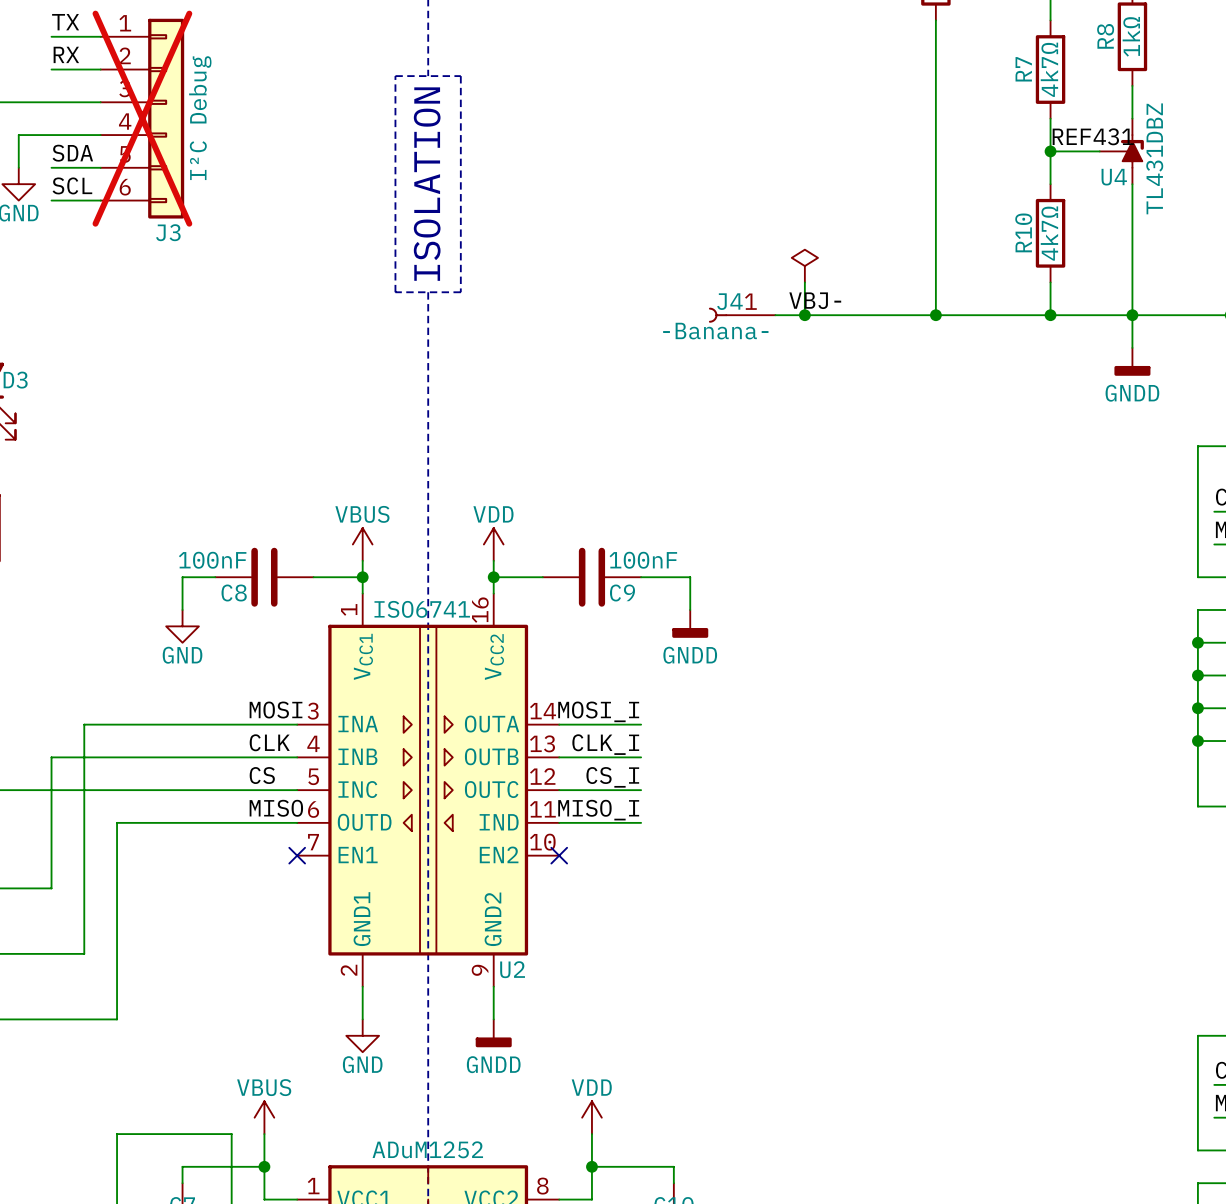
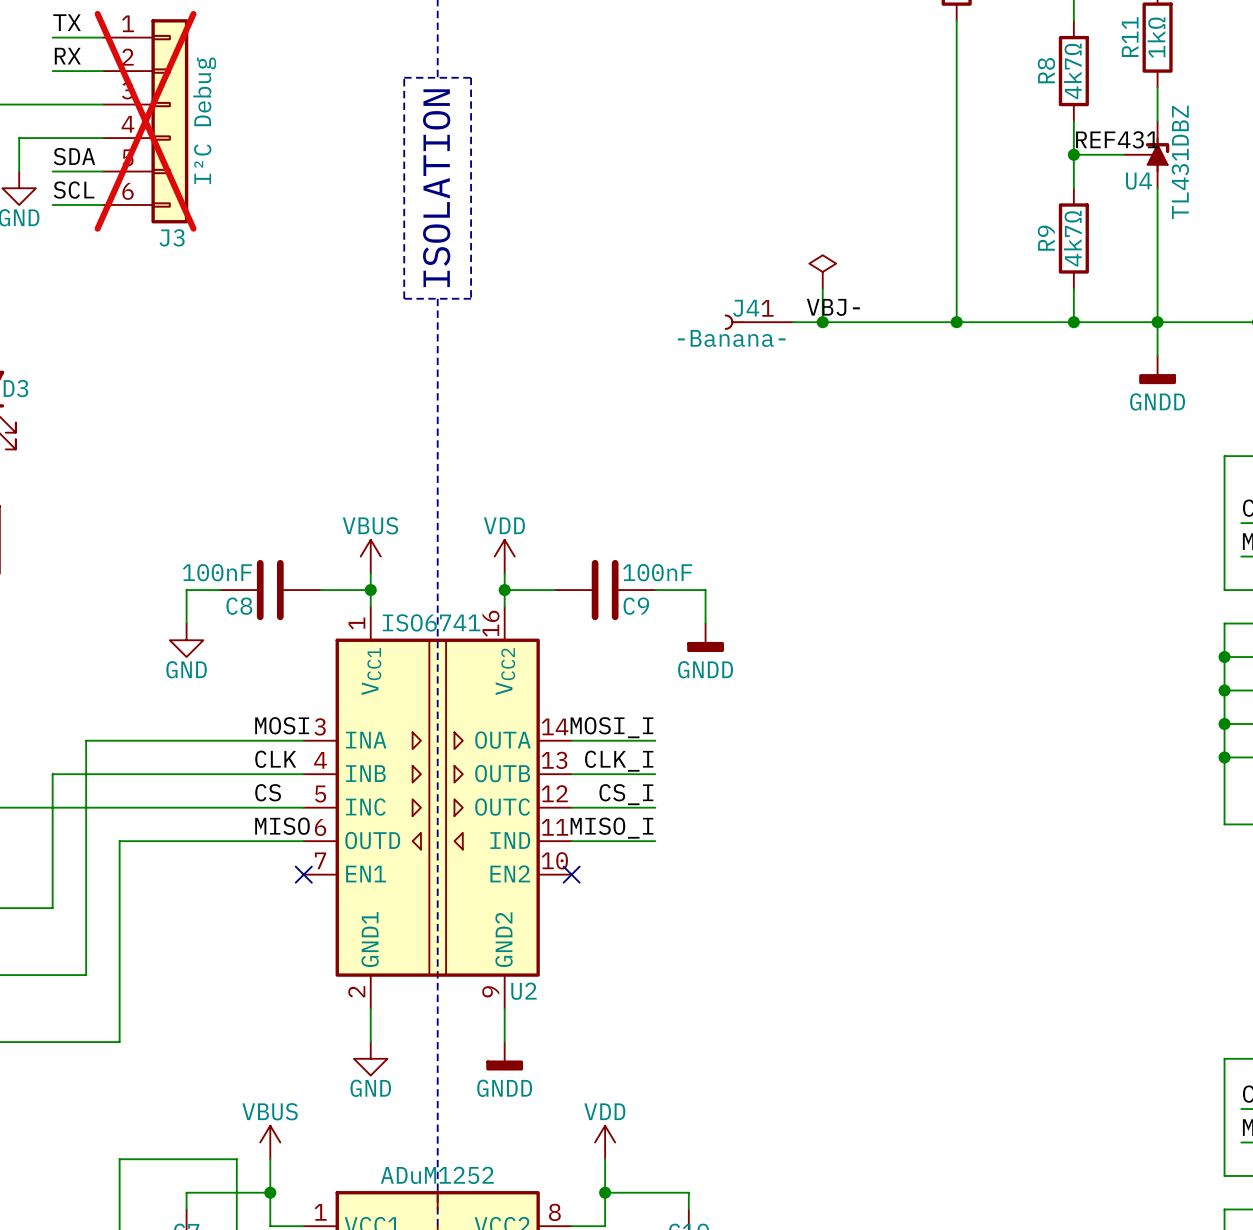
R8 name: R8 (1105, 36) -> R11 (1130, 37)
R7 name: R7 (1023, 69) -> R8 (1046, 70)
U4 symbol: [1099, 118, 1144, 185] -> [1124, 121, 1170, 189]
R10 name: R10 (1023, 232) -> R9 (1046, 238)

